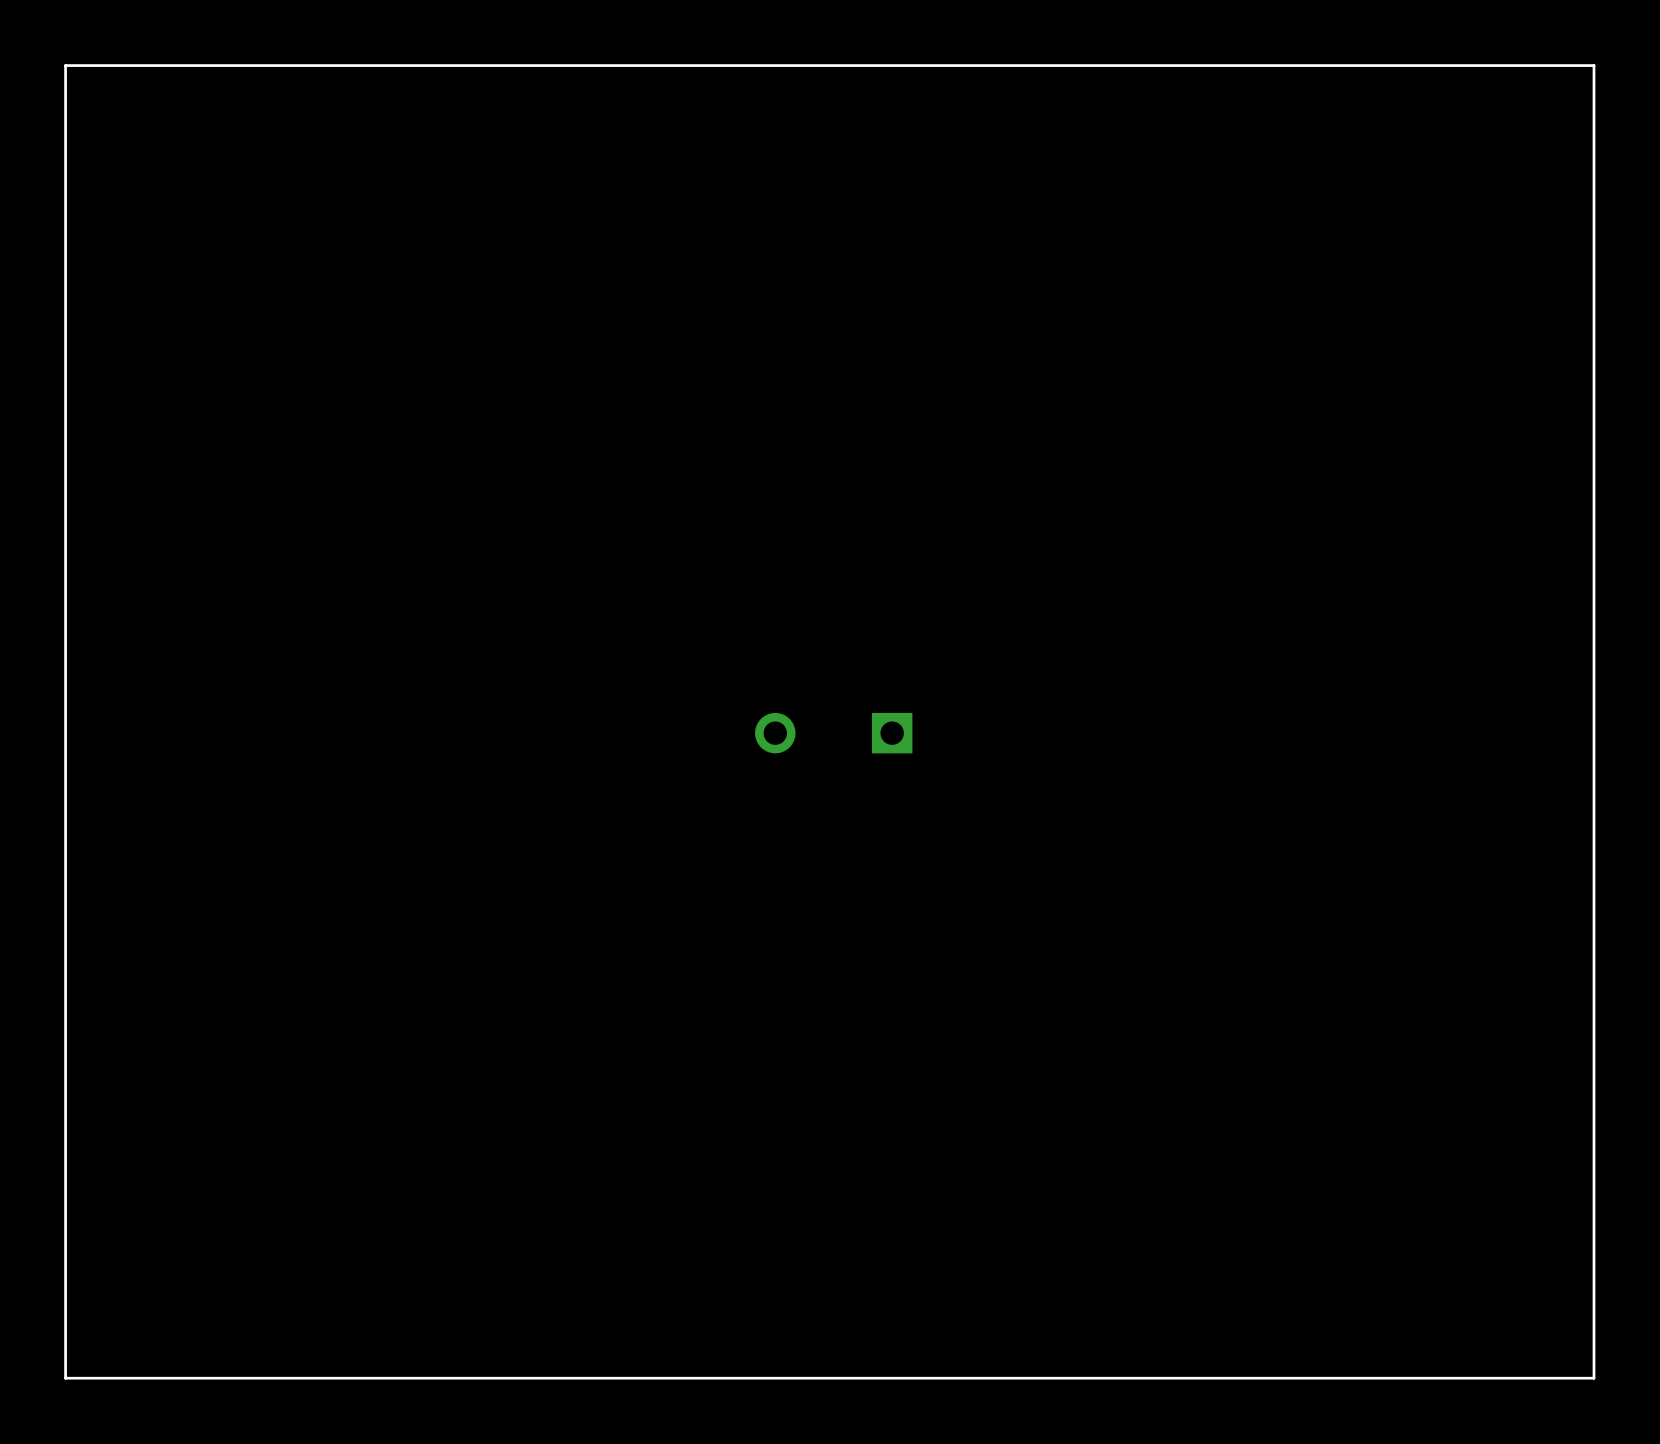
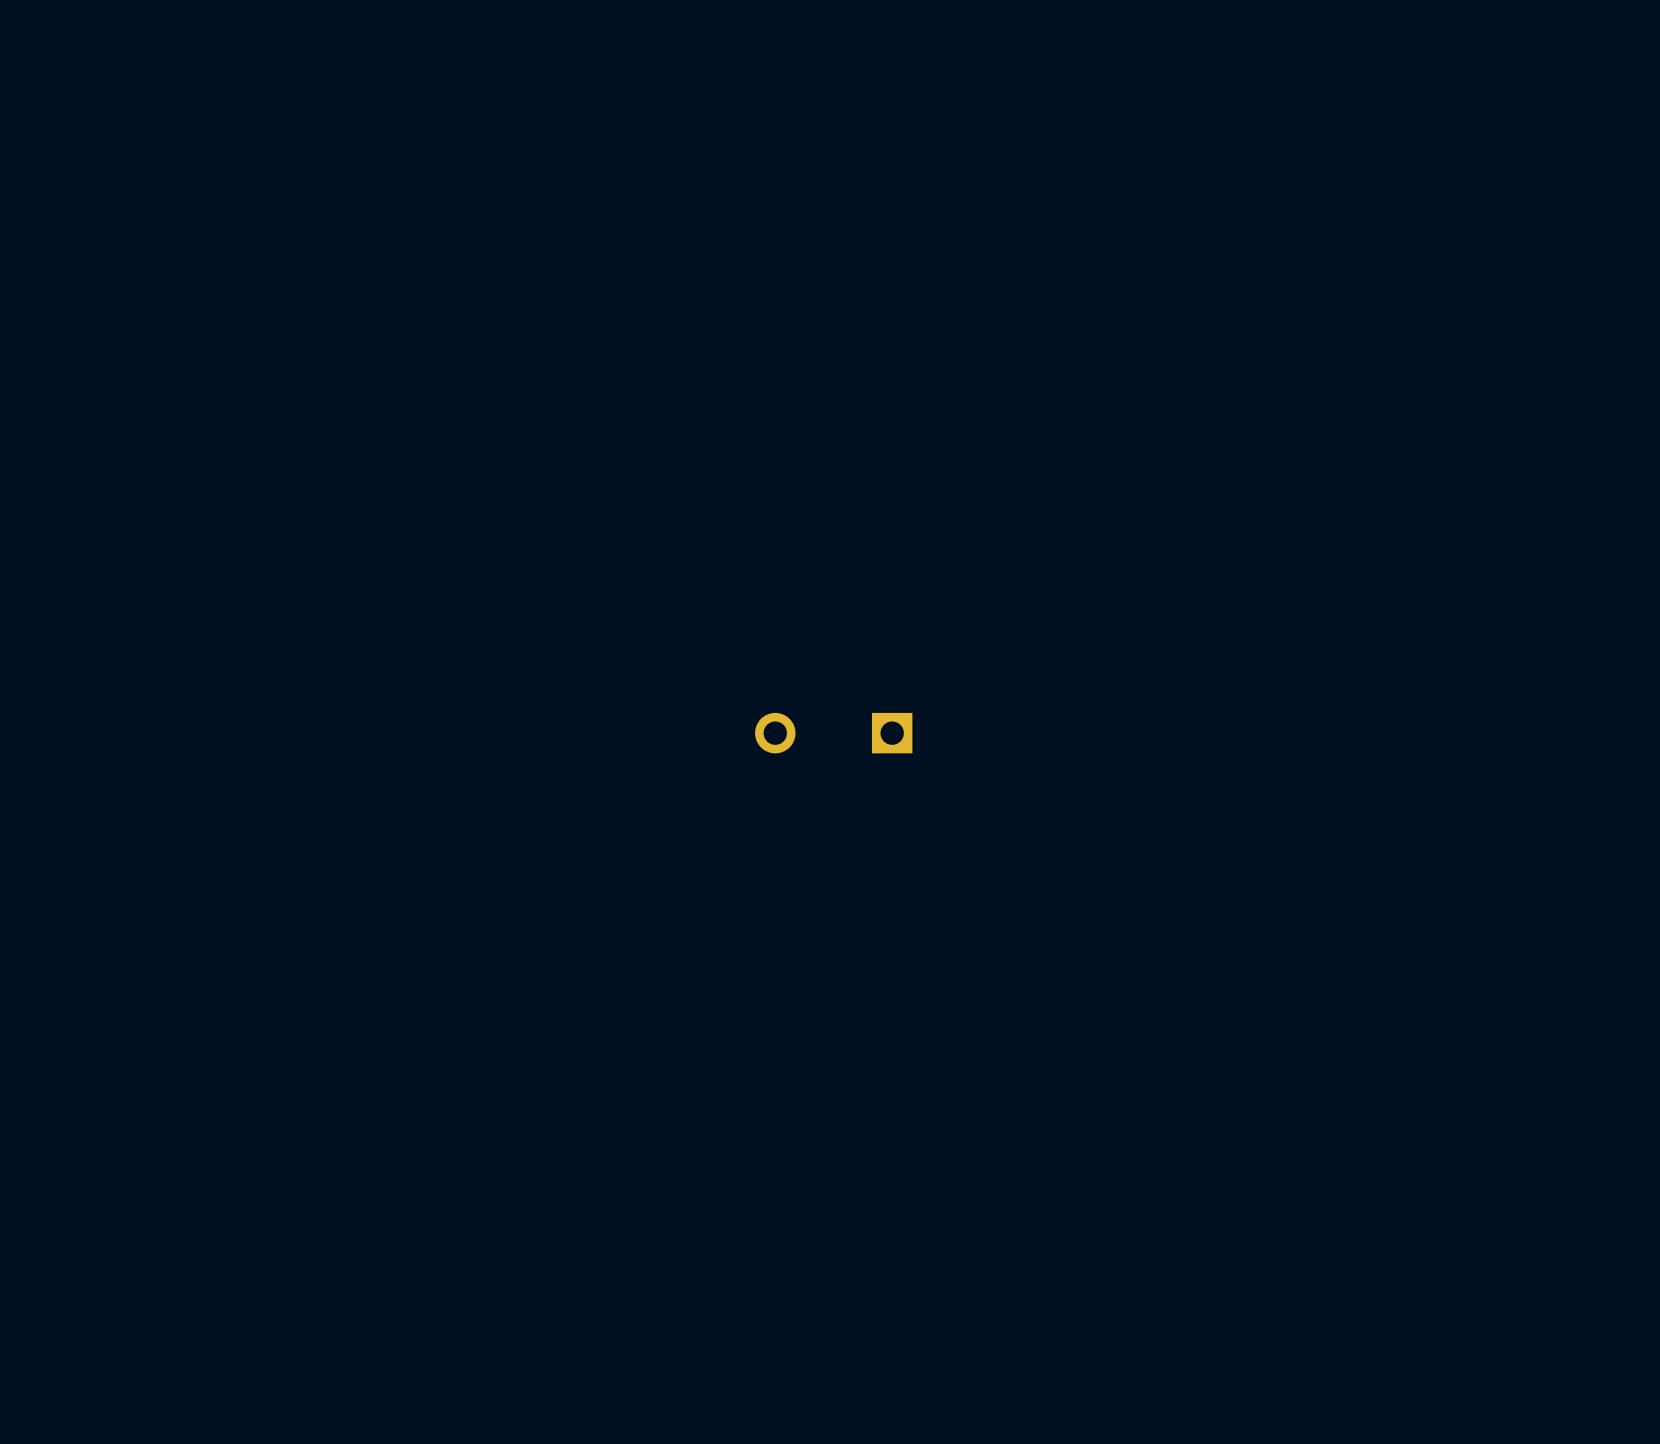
board edge: (1593, 65) (65, 65) (65, 1378) (1593, 1378) (1593, 65) -> none

